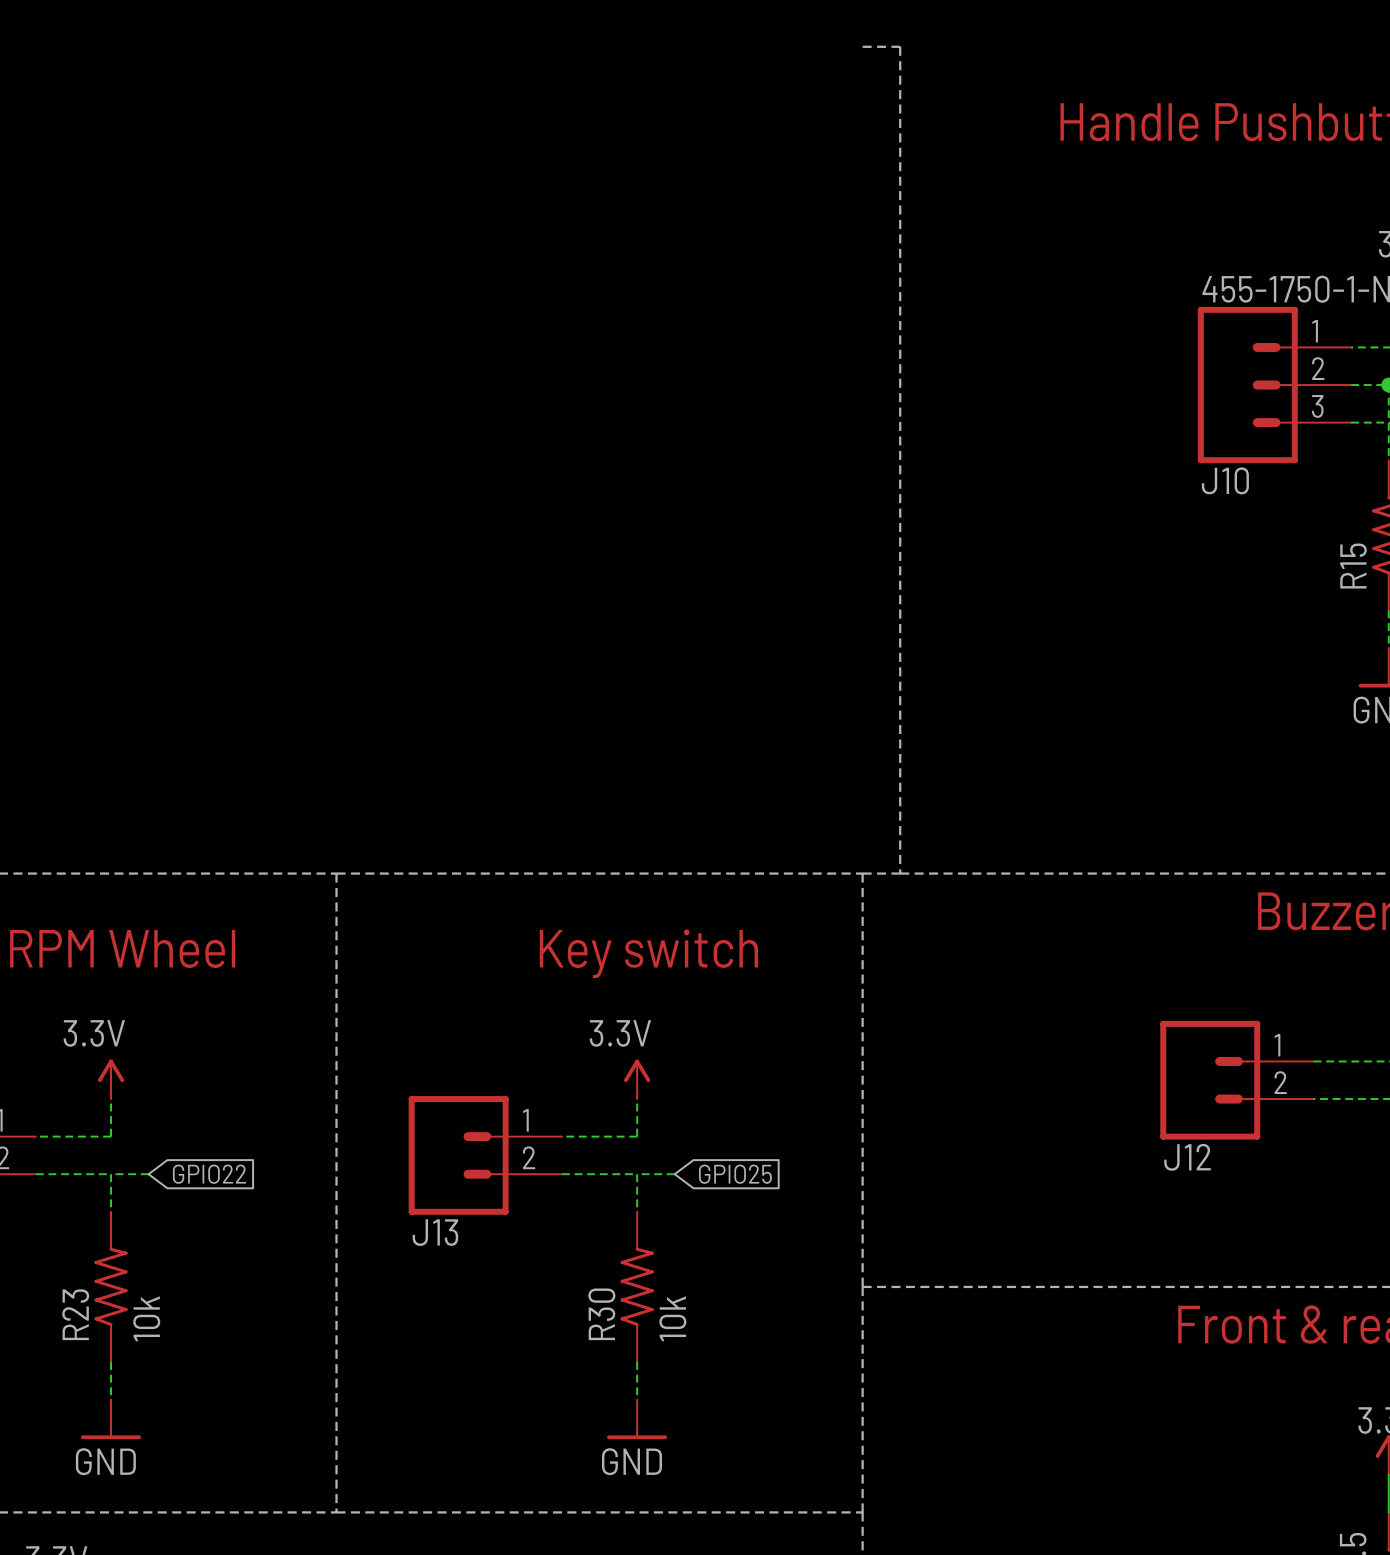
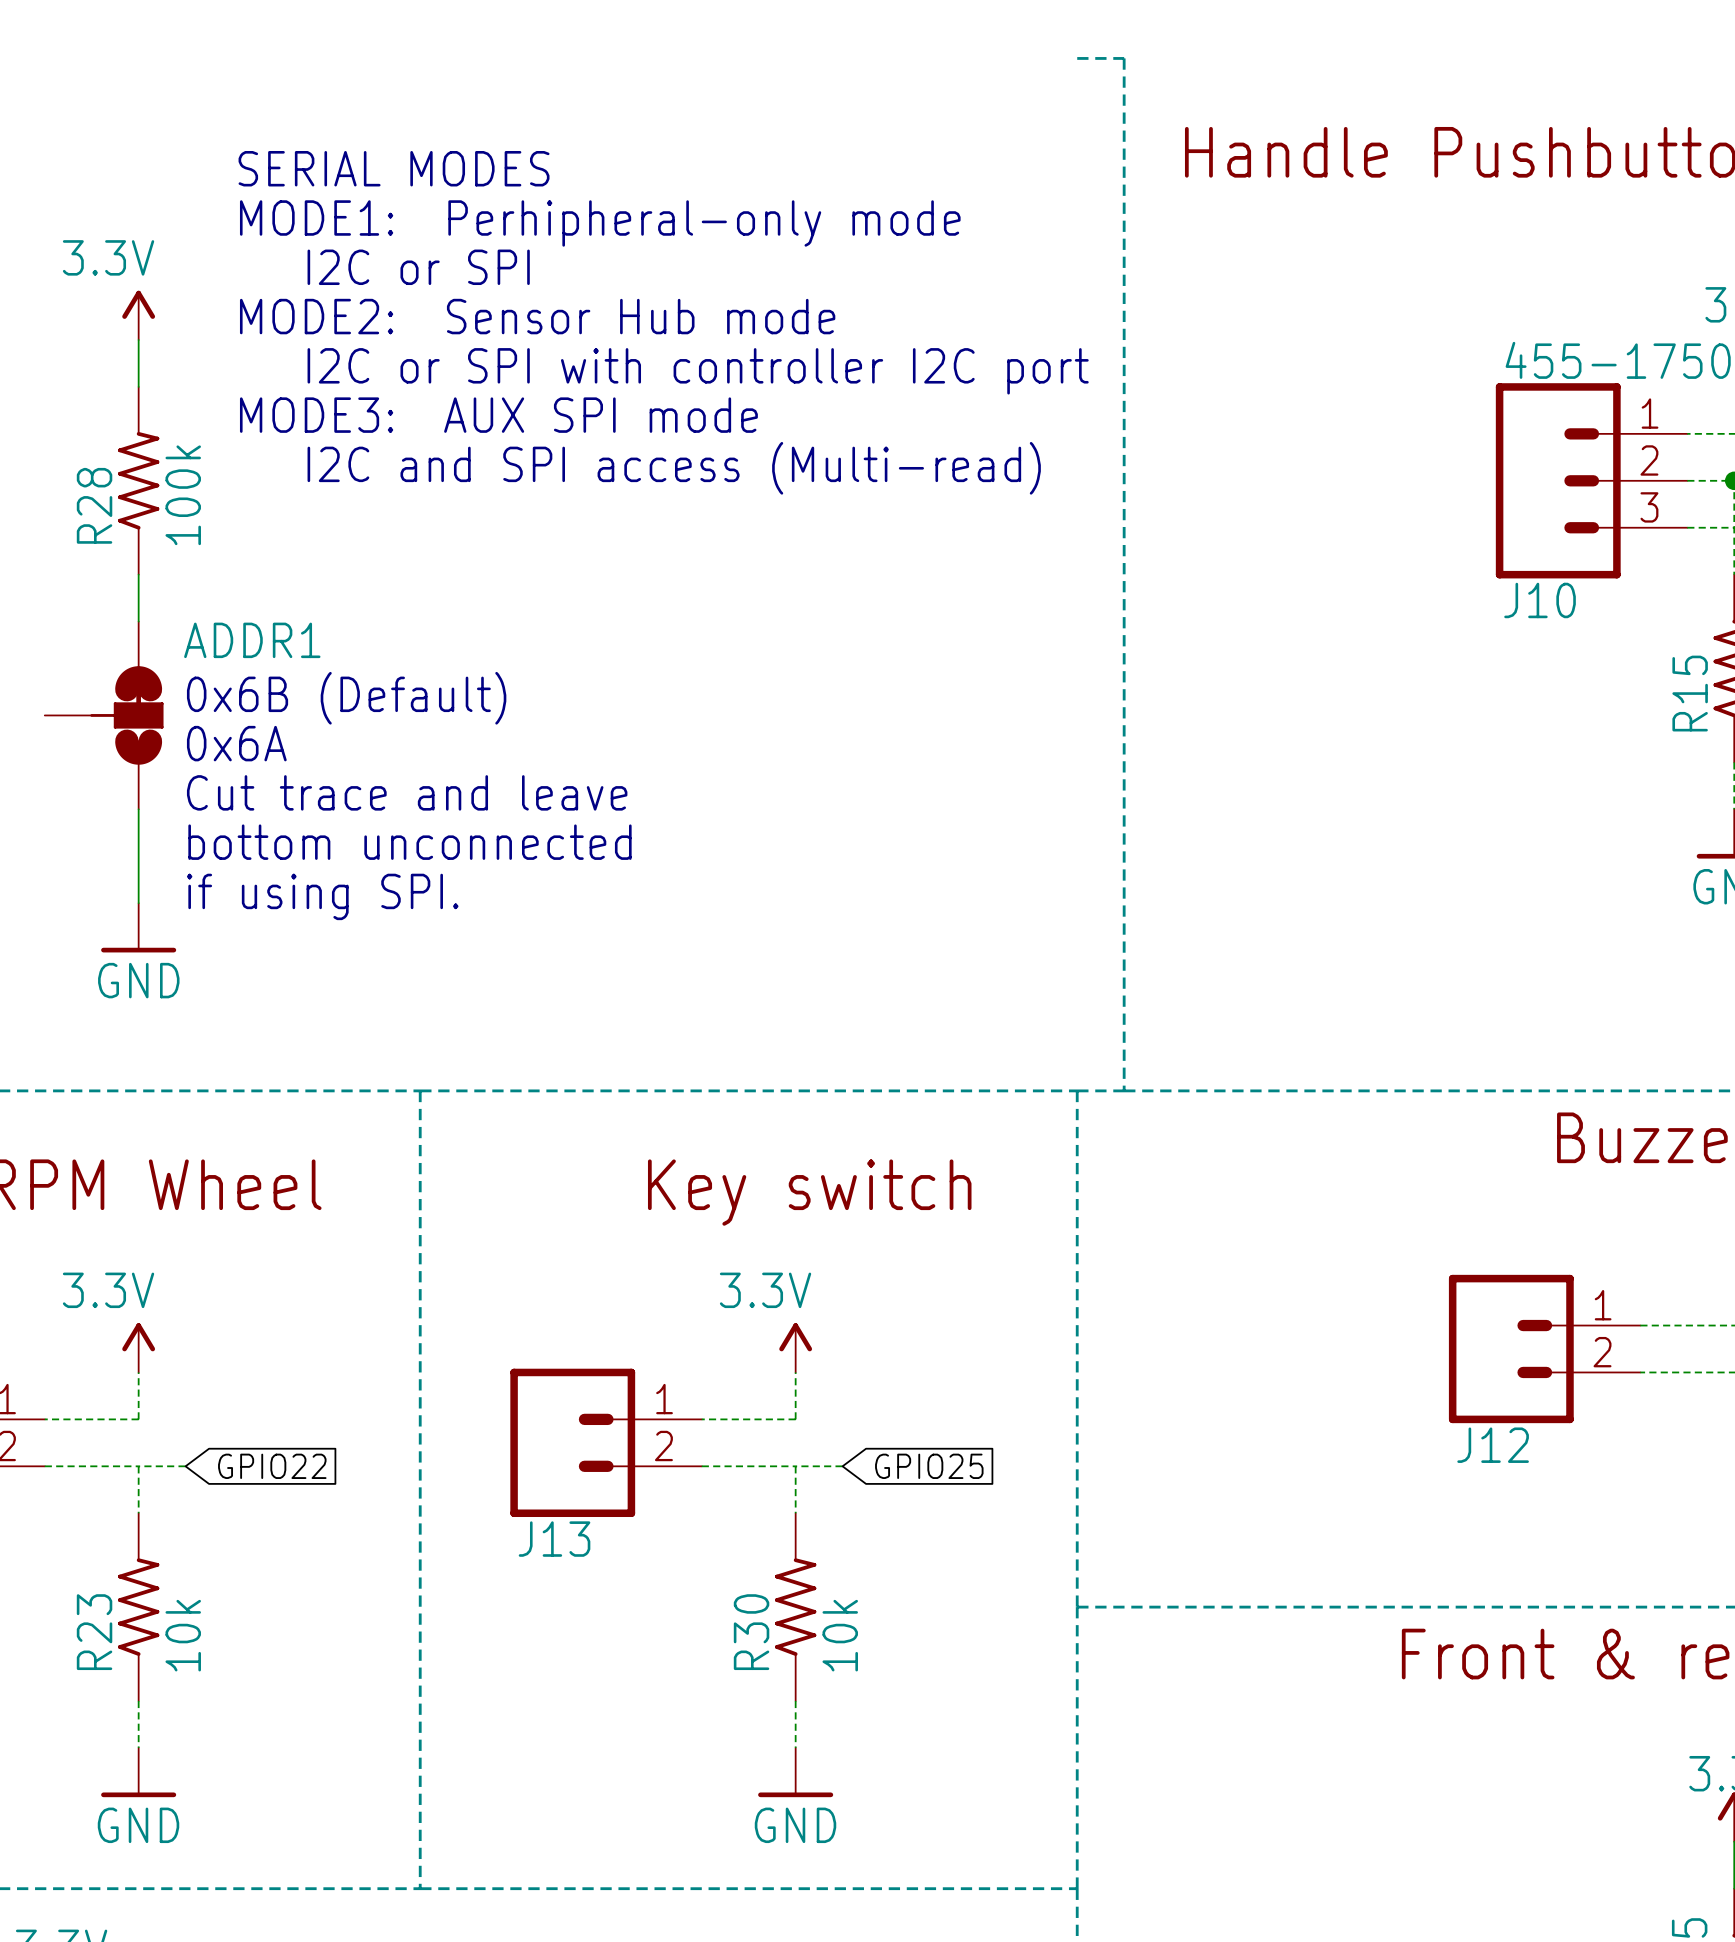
text: none -> SERIAL MODES (394, 168)
text: none -> MODE1: Perhipheral-only mode (600, 223)
text: none -> I2C or SPI (418, 267)
power symbol: none -> 3.3V (138, 315)
text: none -> MODE2: Sensor Hub mode (537, 316)
wire: none -> (138, 340) (138, 386)
text: none -> I2C or SPI with controller I2C port (698, 371)
text: none -> MODE3: AUX SPI mode (498, 415)
text: none -> I2C and SPI access (Multi-read) (674, 468)
R28: none -> 100k (138, 480)
wire: none -> (138, 574) (138, 621)
text: none -> 0x6B (Default) (346, 698)
ADDR1: none -> (104, 715)
text: none -> 0x6A (236, 743)
text: none -> Cut trace and leave (407, 792)
wire: none -> (138, 809) (138, 903)
text: none -> bottom unconnected (409, 842)
text: none -> if using SPI. (322, 896)
power symbol: none -> GND (138, 927)

